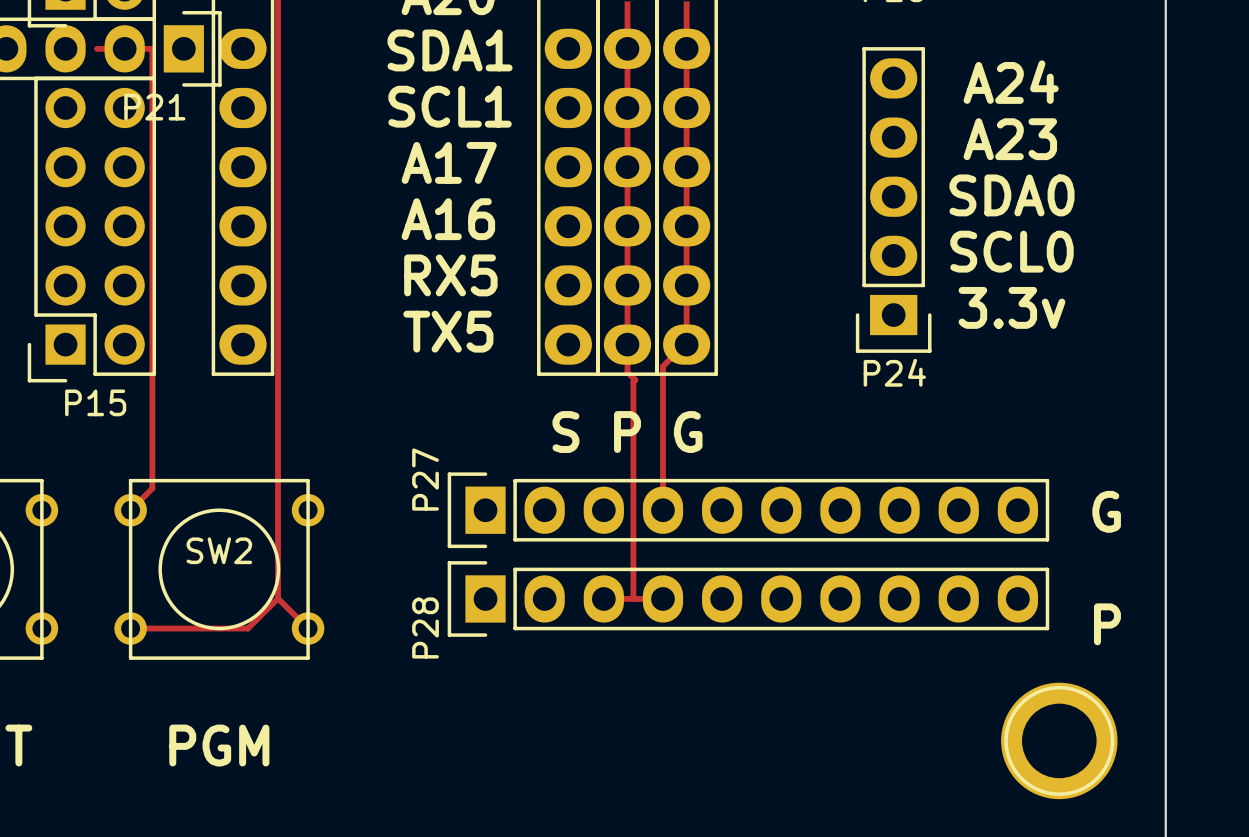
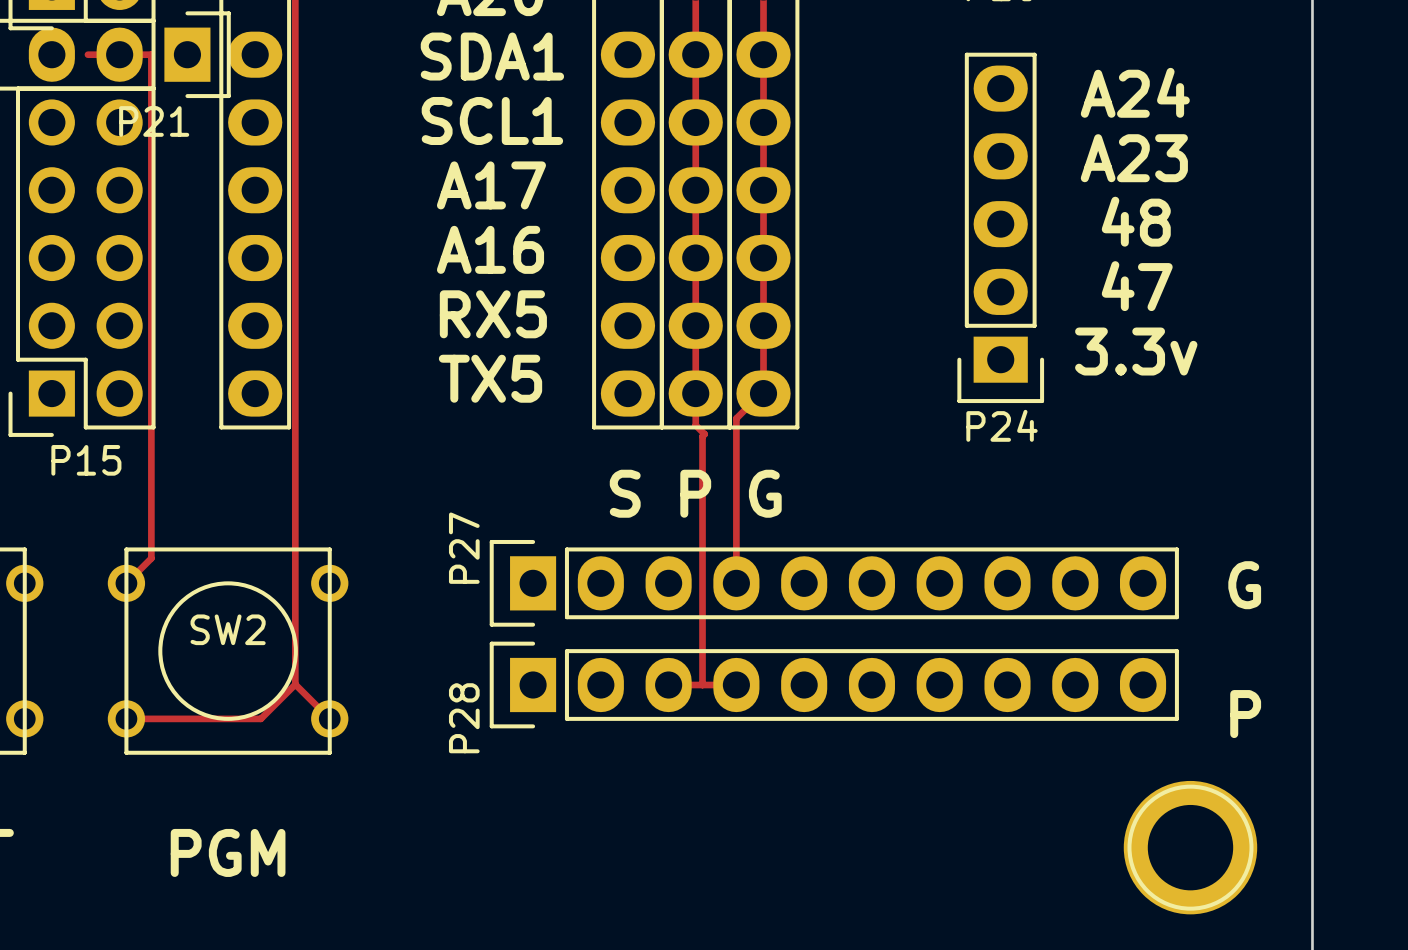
text: SDA0 (1011, 195) -> 48 (1136, 221)
text: SCL0 (1011, 251) -> 47 (1137, 286)

